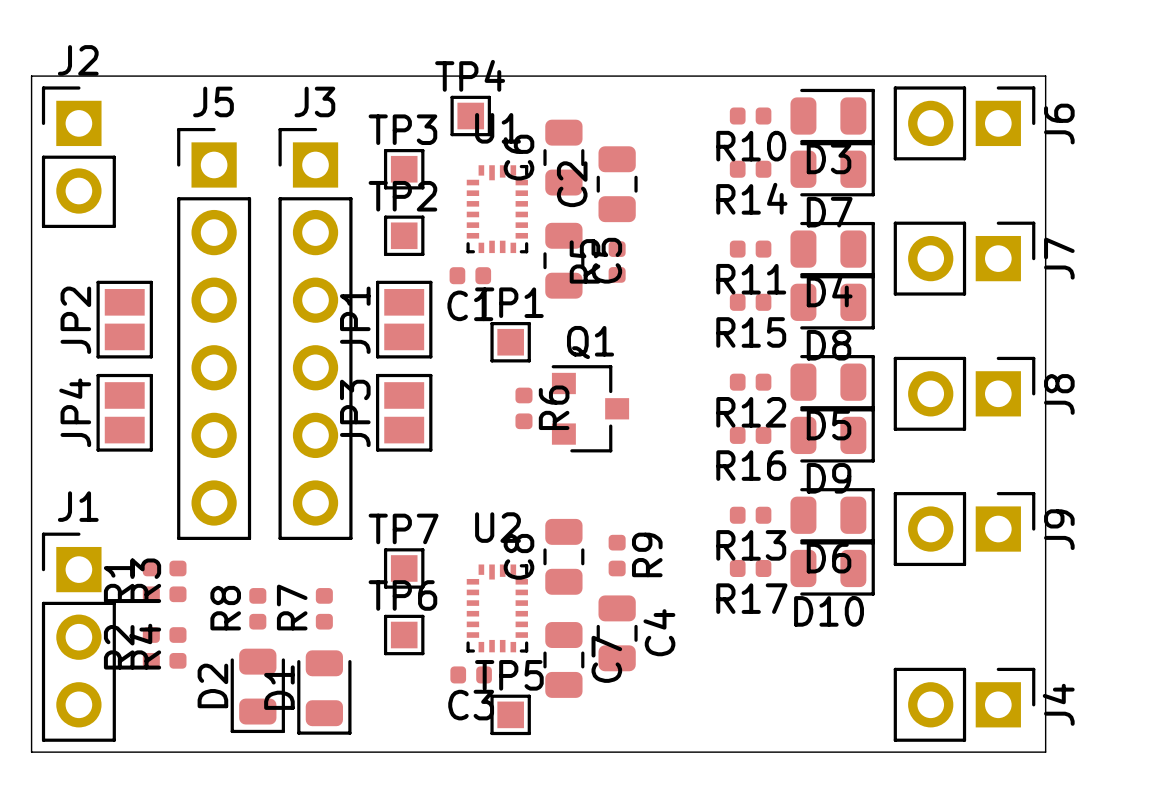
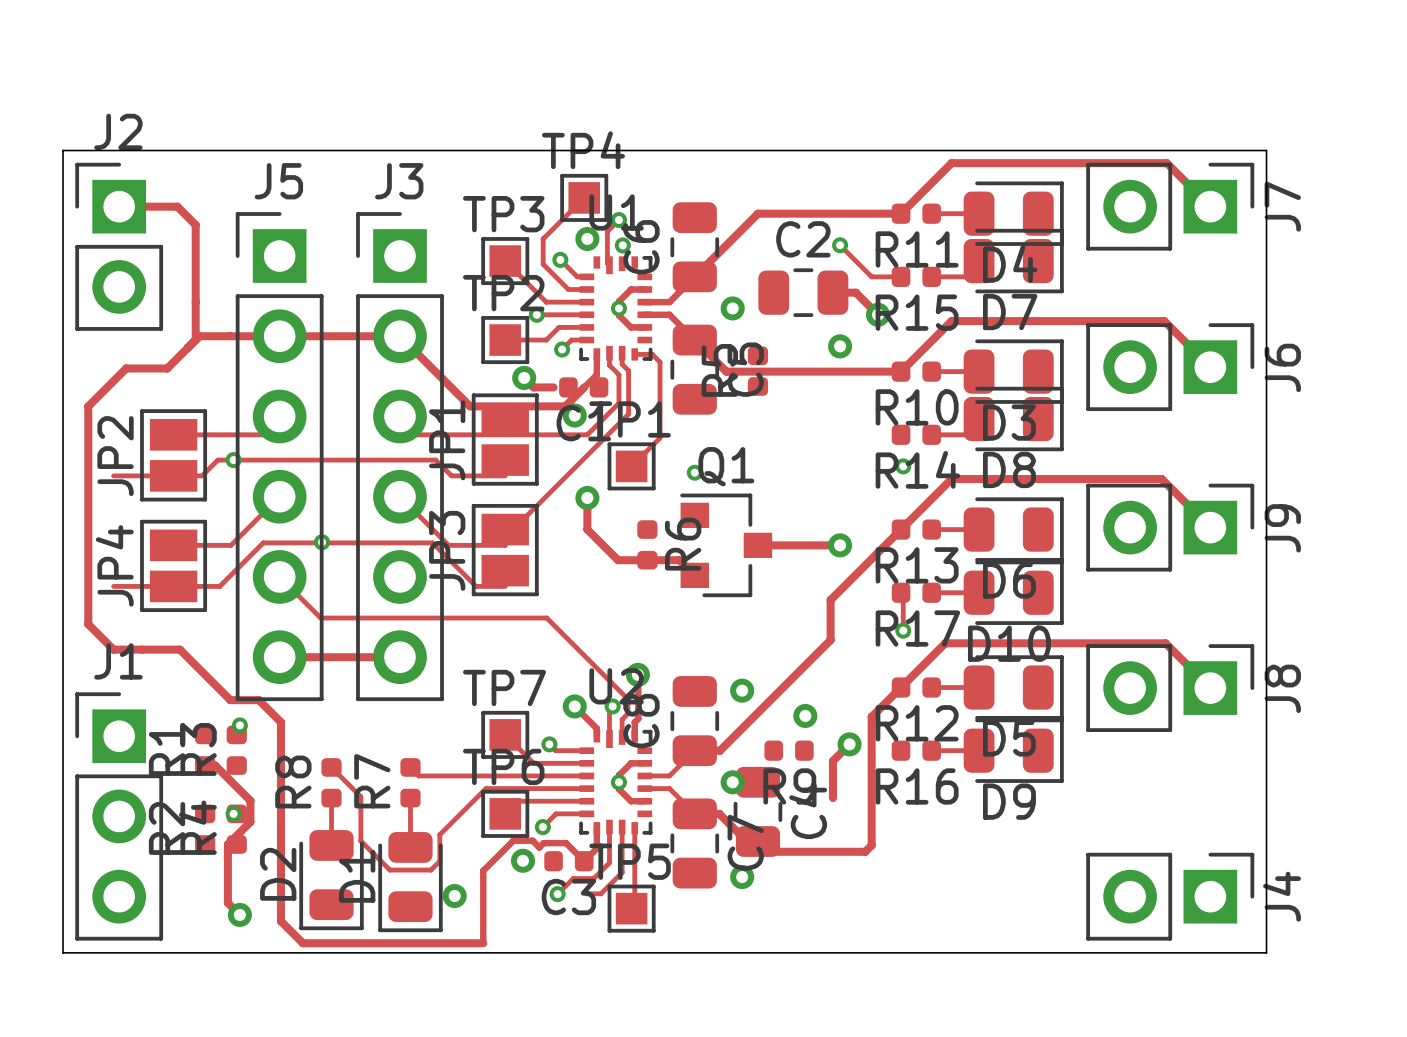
track: none -> (584, 197) (543, 238) (543, 264) (568, 289) (586, 289)
R10 position: (750, 116) -> (916, 371)
D3 position: (832, 116) -> (1013, 371)
track: none -> (119, 206) (177, 206) (195, 224) (195, 340)
track: none -> (1210, 206) (1166, 163) (951, 163) (901, 213) (757, 213) (669, 302) (644, 302)
J6 name: J6 (1059, 124) -> J7 (1282, 206)
track: none -> (931, 213) (979, 213)
track: none -> (618, 220) (607, 231) (607, 263) (609, 265)
via: none -> (618, 220)
via: none -> (587, 238)
track: none -> (840, 245) (871, 276) (901, 276)
via: none -> (840, 245)
via: none -> (622, 245)
track: none -> (560, 259) (577, 276) (586, 276)
via: none -> (560, 259)
track: none -> (505, 261) (546, 302) (586, 302)
R14 position: (750, 169) -> (916, 434)
track: none -> (931, 276) (979, 276)
C2 rotation: 0° (617, 184) -> 90° clockwise (803, 292)
track: none -> (644, 289) (631, 289) (618, 301) (618, 315) (631, 327) (644, 327)
track: none -> (832, 292) (855, 292) (877, 314)
via: none -> (618, 308)
via: none -> (732, 308)
track: none -> (536, 314) (586, 314)
via: none -> (536, 314)
track: none -> (644, 314) (669, 314) (726, 371) (901, 371) (951, 321) (1164, 321) (1210, 367)
via: none -> (877, 314)
track: none -> (586, 327) (558, 327) (546, 340) (505, 340)
track: none -> (586, 340) (571, 340) (562, 349)
via: none -> (840, 346)
via: none -> (562, 349)
track: none -> (609, 353) (609, 365) (618, 374) (618, 403) (587, 434) (418, 434) (400, 416)
track: none -> (622, 353) (622, 364) (628, 370) (628, 414) (505, 537) (505, 545) (448, 545) (400, 496)
track: none -> (596, 354) (596, 374) (565, 406) (470, 406) (400, 336) (199, 336) (167, 368) (126, 368) (88, 406) (88, 624) (113, 649) (179, 649) (230, 700) (258, 700) (280, 722) (280, 921) (302, 943) (483, 943) (483, 870) (513, 840) (532, 840) (539, 847) (543, 843) (566, 843) (584, 861) (596, 848) (596, 828)
track: none -> (634, 354) (652, 354) (660, 362) (660, 437) (631, 466)
R11 position: (750, 249) -> (916, 213)
D4 position: (832, 249) -> (1013, 213)
J7 name: J7 (1059, 258) -> J6 (1282, 367)
track: none -> (931, 371) (979, 371)
track: none -> (524, 377) (533, 387) (553, 387)
via: none -> (524, 377)
via: none -> (574, 415)
track: none -> (279, 416) (261, 434) (173, 434)
R15 position: (750, 302) -> (916, 276)
track: none -> (931, 434) (979, 434)
JP2 position: (124, 319) -> (173, 455)
via: none -> (233, 460)
via: none -> (903, 466)
via: none -> (694, 472)
track: none -> (113, 475) (202, 475) (217, 460) (435, 460) (451, 475) (505, 475)
track: none -> (279, 496) (231, 545) (173, 545)
track: none -> (587, 497) (587, 529) (618, 560) (679, 560) (694, 575)
via: none -> (587, 497)
R12 position: (750, 382) -> (916, 687)
D5 position: (832, 382) -> (1013, 687)
track: none -> (1210, 527) (1161, 479) (951, 479) (830, 600) (830, 640) (720, 750) (694, 750) (669, 775) (644, 775)
J8 name: J8 (1059, 394) -> J9 (1282, 528)
track: none -> (931, 529) (979, 529)
via: none -> (322, 542)
track: none -> (757, 545) (840, 545)
via: none -> (840, 545)
JP4 position: (124, 412) -> (173, 565)
track: none -> (279, 576) (320, 618) (546, 618) (627, 699) (627, 713) (622, 719) (622, 737)
R16 position: (750, 435) -> (916, 750)
D9 position: (832, 435) -> (1013, 750)
track: none -> (113, 586) (219, 586) (263, 542) (432, 542) (476, 586) (505, 586)
track: none -> (901, 592) (903, 594) (903, 630)
track: none -> (931, 592) (979, 592)
via: none -> (903, 630)
track: none -> (279, 657) (400, 657)
R13 position: (750, 515) -> (916, 529)
D6 position: (832, 515) -> (1013, 529)
via: none -> (637, 674)
track: none -> (638, 681) (638, 718) (634, 722) (634, 736)
track: none -> (931, 687) (979, 687)
track: none -> (1210, 688) (1165, 643) (945, 643) (871, 716) (871, 845) (865, 851) (757, 851) (719, 813) (694, 813) (669, 788) (644, 788)
J9 name: J9 (1059, 529) -> J8 (1282, 688)
via: none -> (742, 690)
track: none -> (574, 706) (596, 728) (596, 736)
via: none -> (574, 706)
track: none -> (612, 706) (609, 709) (609, 739)
via: none -> (612, 706)
via: none -> (805, 715)
R9 rotation: 0° (617, 555) -> 90° clockwise (789, 750)
R9 position: (617, 555) -> (789, 750)
via: none -> (239, 725)
track: none -> (505, 734) (533, 763) (586, 763)
R17 position: (750, 568) -> (916, 592)
D10 position: (832, 568) -> (1013, 592)
track: none -> (549, 744) (555, 750) (586, 750)
via: none -> (549, 744)
track: none -> (849, 744) (832, 760) (832, 798)
via: none -> (849, 744)
track: none -> (931, 750) (979, 750)
track: none -> (644, 763) (631, 763) (618, 775) (618, 789) (631, 801) (644, 801)
track: none -> (205, 765) (215, 765) (250, 800) (250, 821) (227, 844) (227, 902) (239, 914)
track: none -> (331, 767) (360, 796) (360, 841) (389, 870) (431, 870) (439, 861) (439, 834) (485, 788) (586, 788)
track: none -> (410, 767) (419, 775) (586, 775)
via: none -> (618, 782)
via: none -> (732, 782)
track: none -> (331, 798) (331, 845)
track: none -> (410, 798) (410, 847)
track: none -> (586, 801) (517, 801) (505, 813)
via: none -> (233, 813)
track: none -> (586, 813) (556, 813) (542, 827)
via: none -> (542, 827)
track: none -> (609, 827) (609, 862) (593, 878) (573, 878) (557, 894)
track: none -> (622, 827) (622, 872) (600, 893) (586, 893)
track: none -> (634, 828) (634, 905) (631, 908)
via: none -> (523, 860)
C3 position: (471, 674) -> (568, 861)
via: none -> (742, 877)
via: none -> (557, 894)
via: none -> (454, 895)
via: none -> (239, 914)

